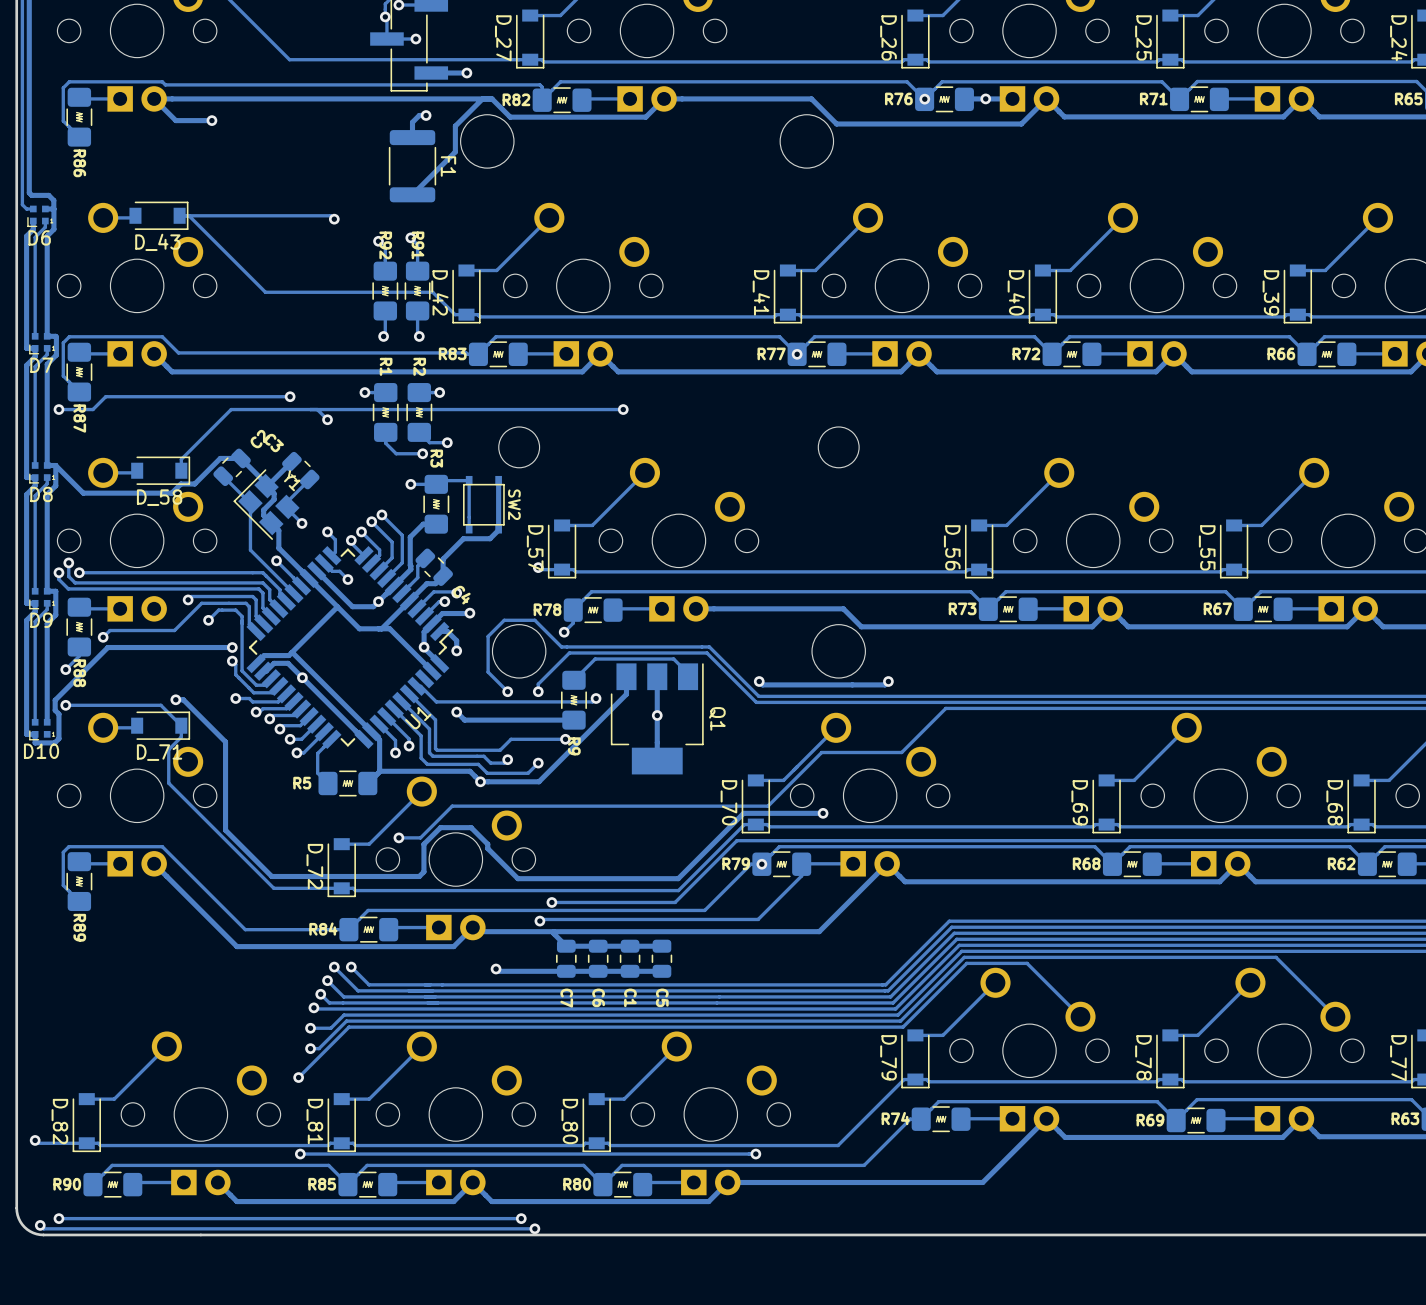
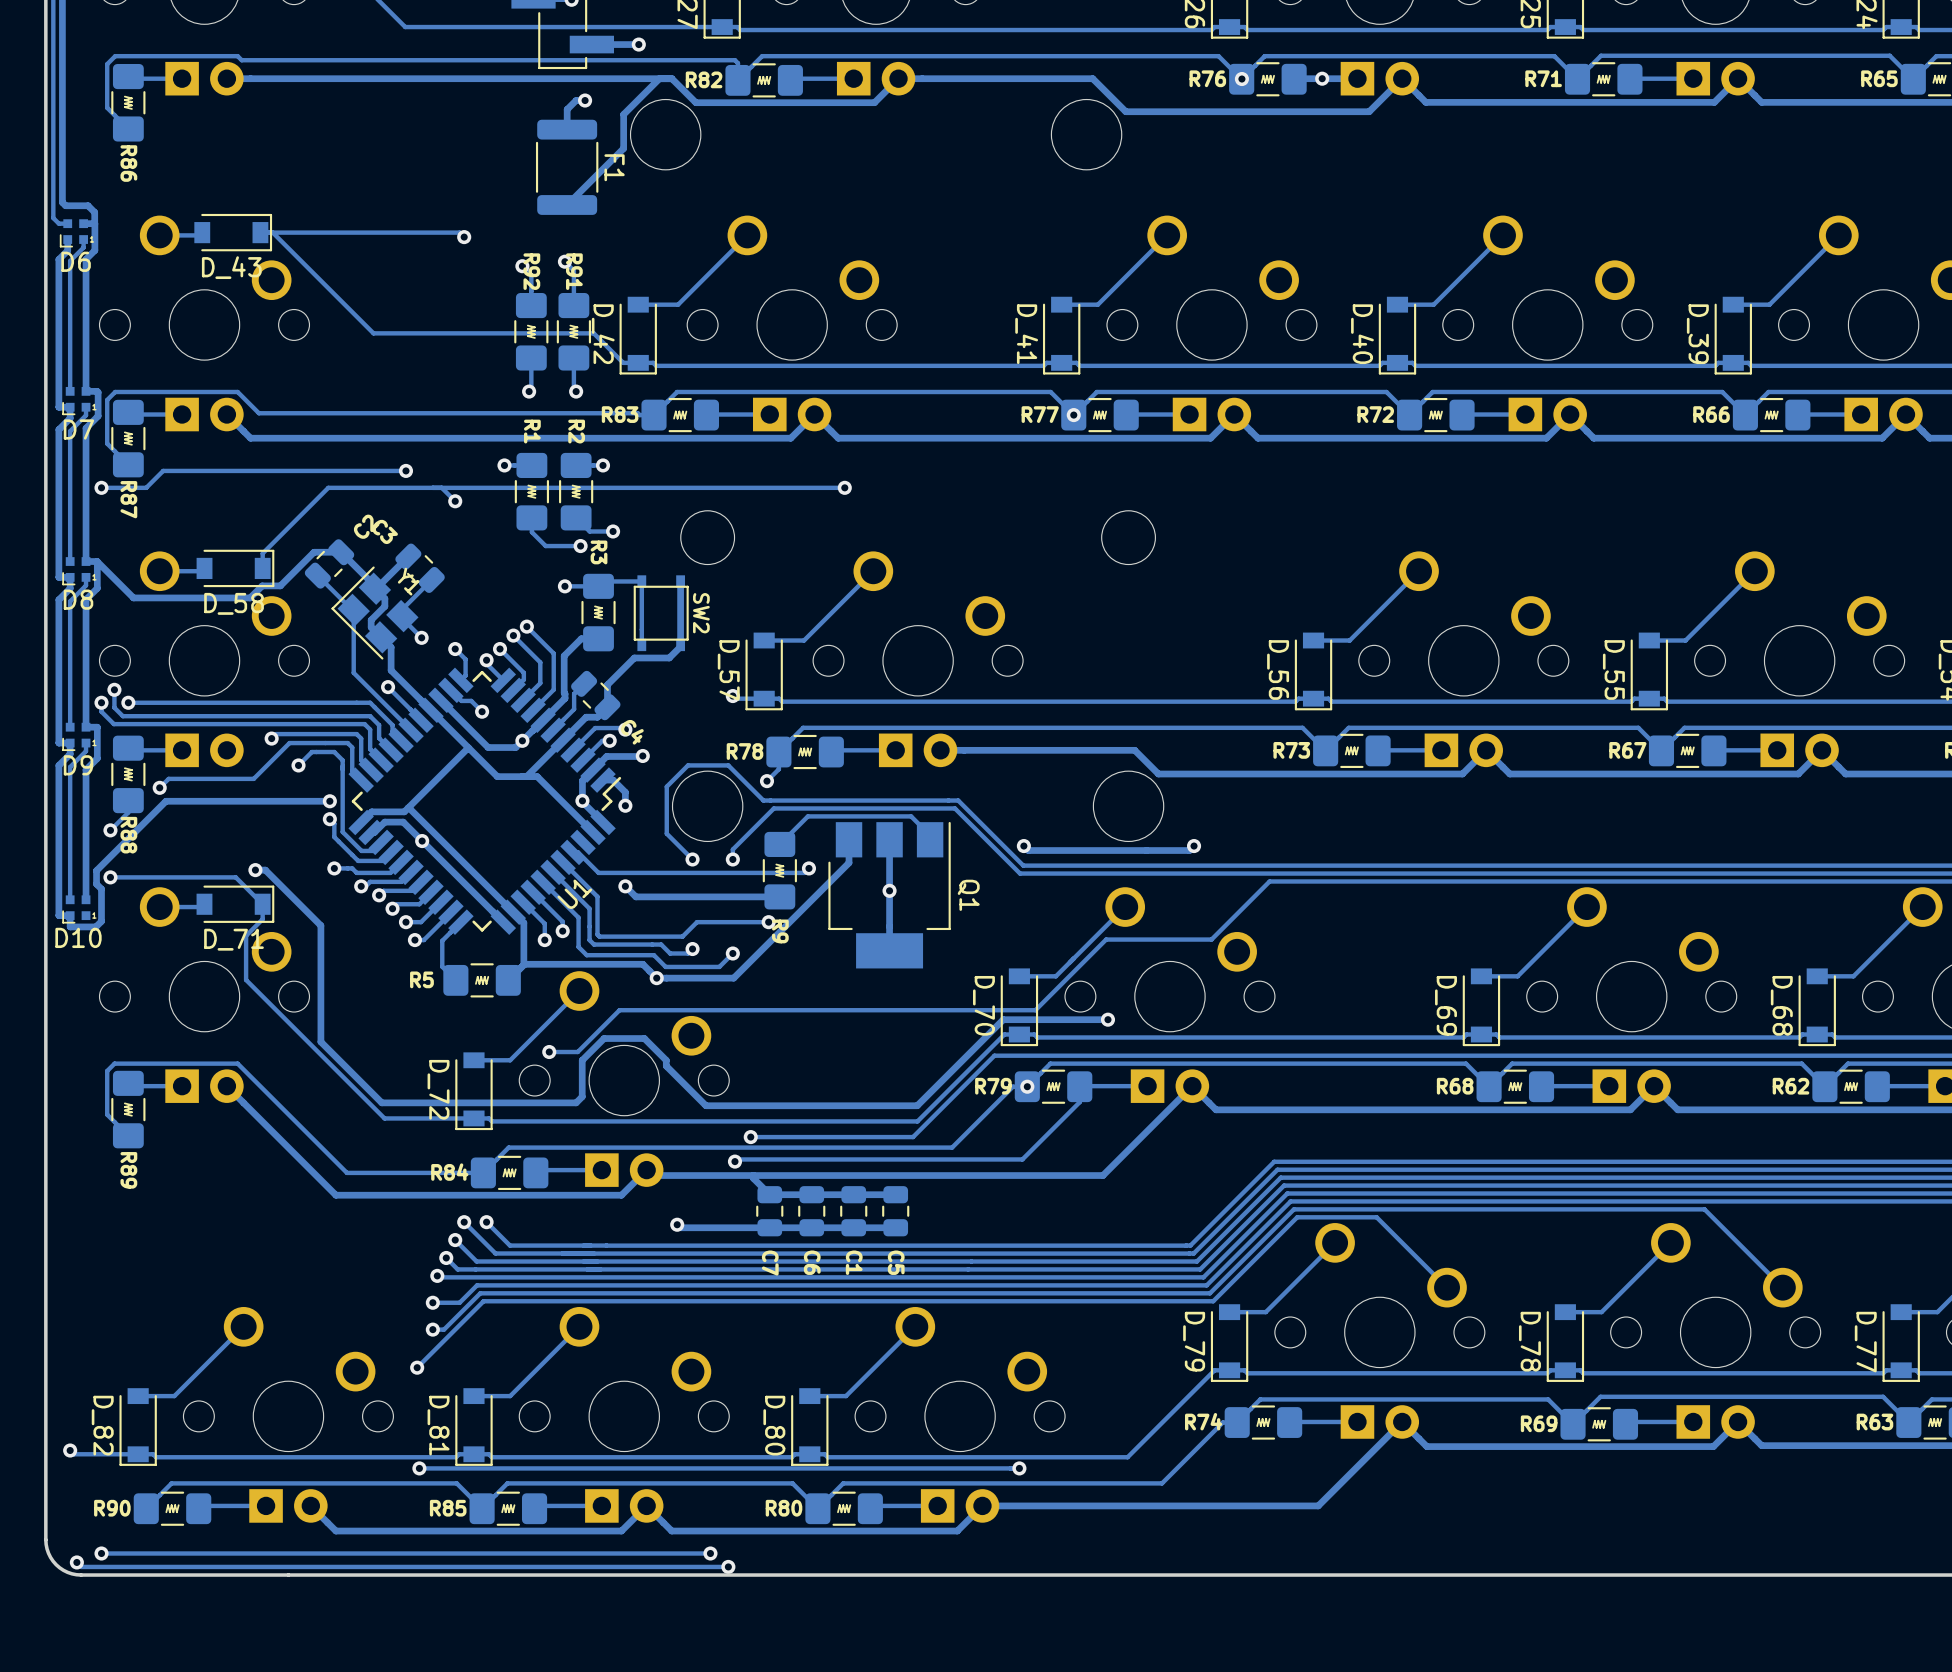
track: (154, 98) (175, 120) (211, 120) -> none
via: (211, 120) -> none

